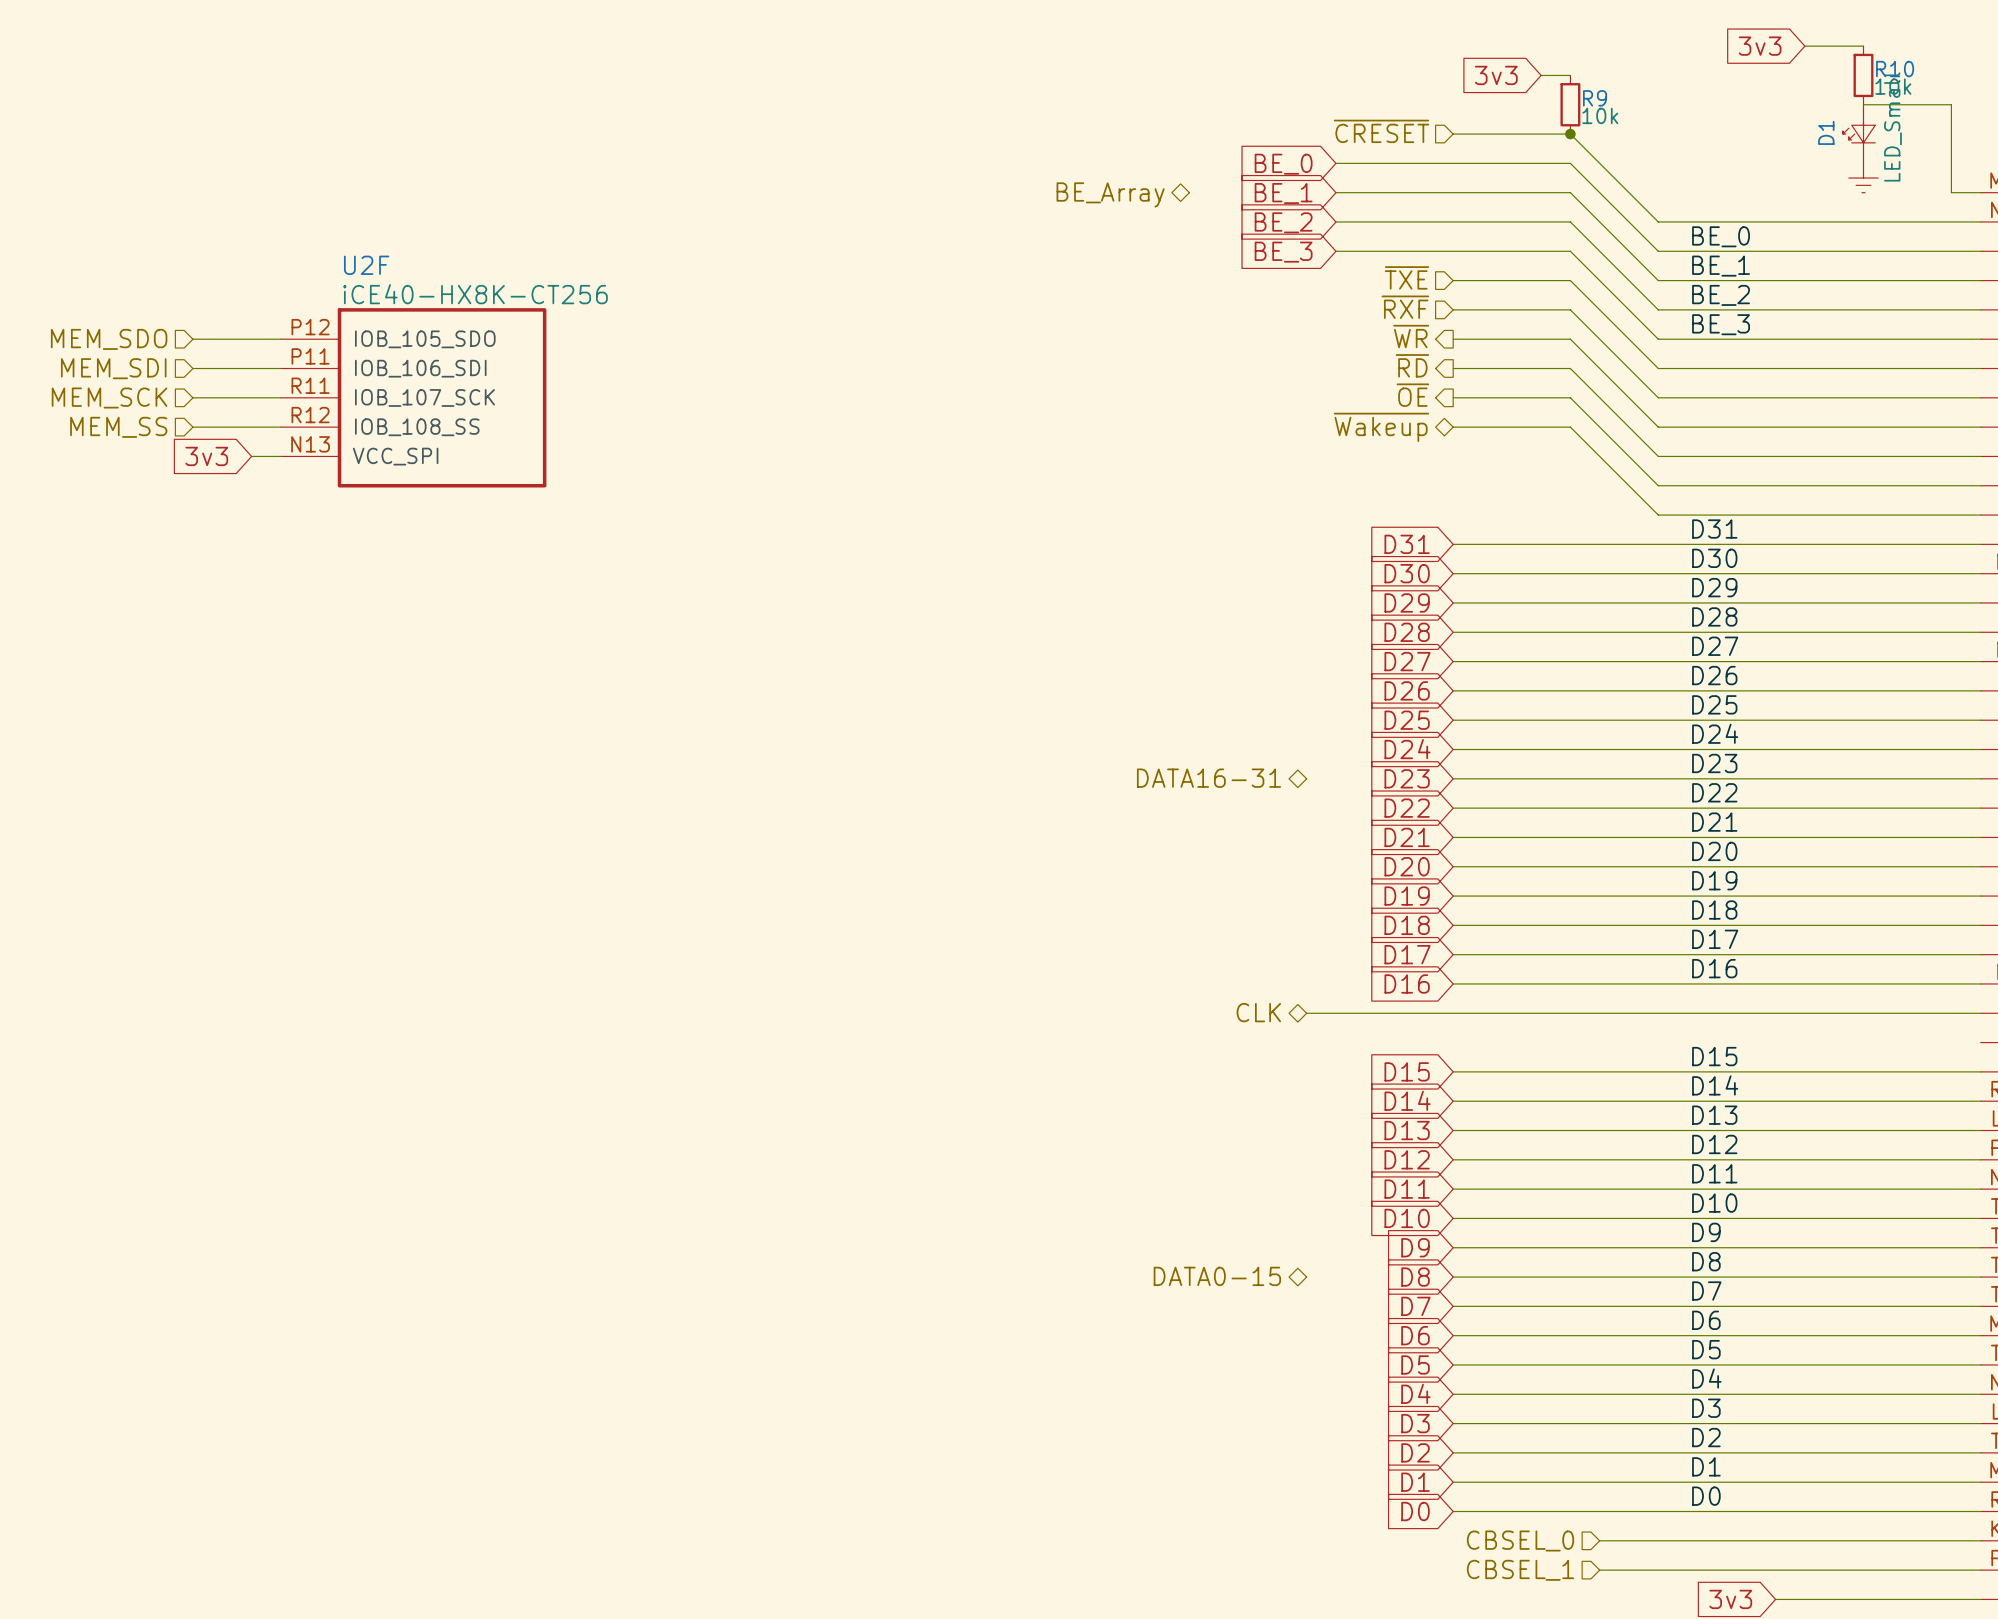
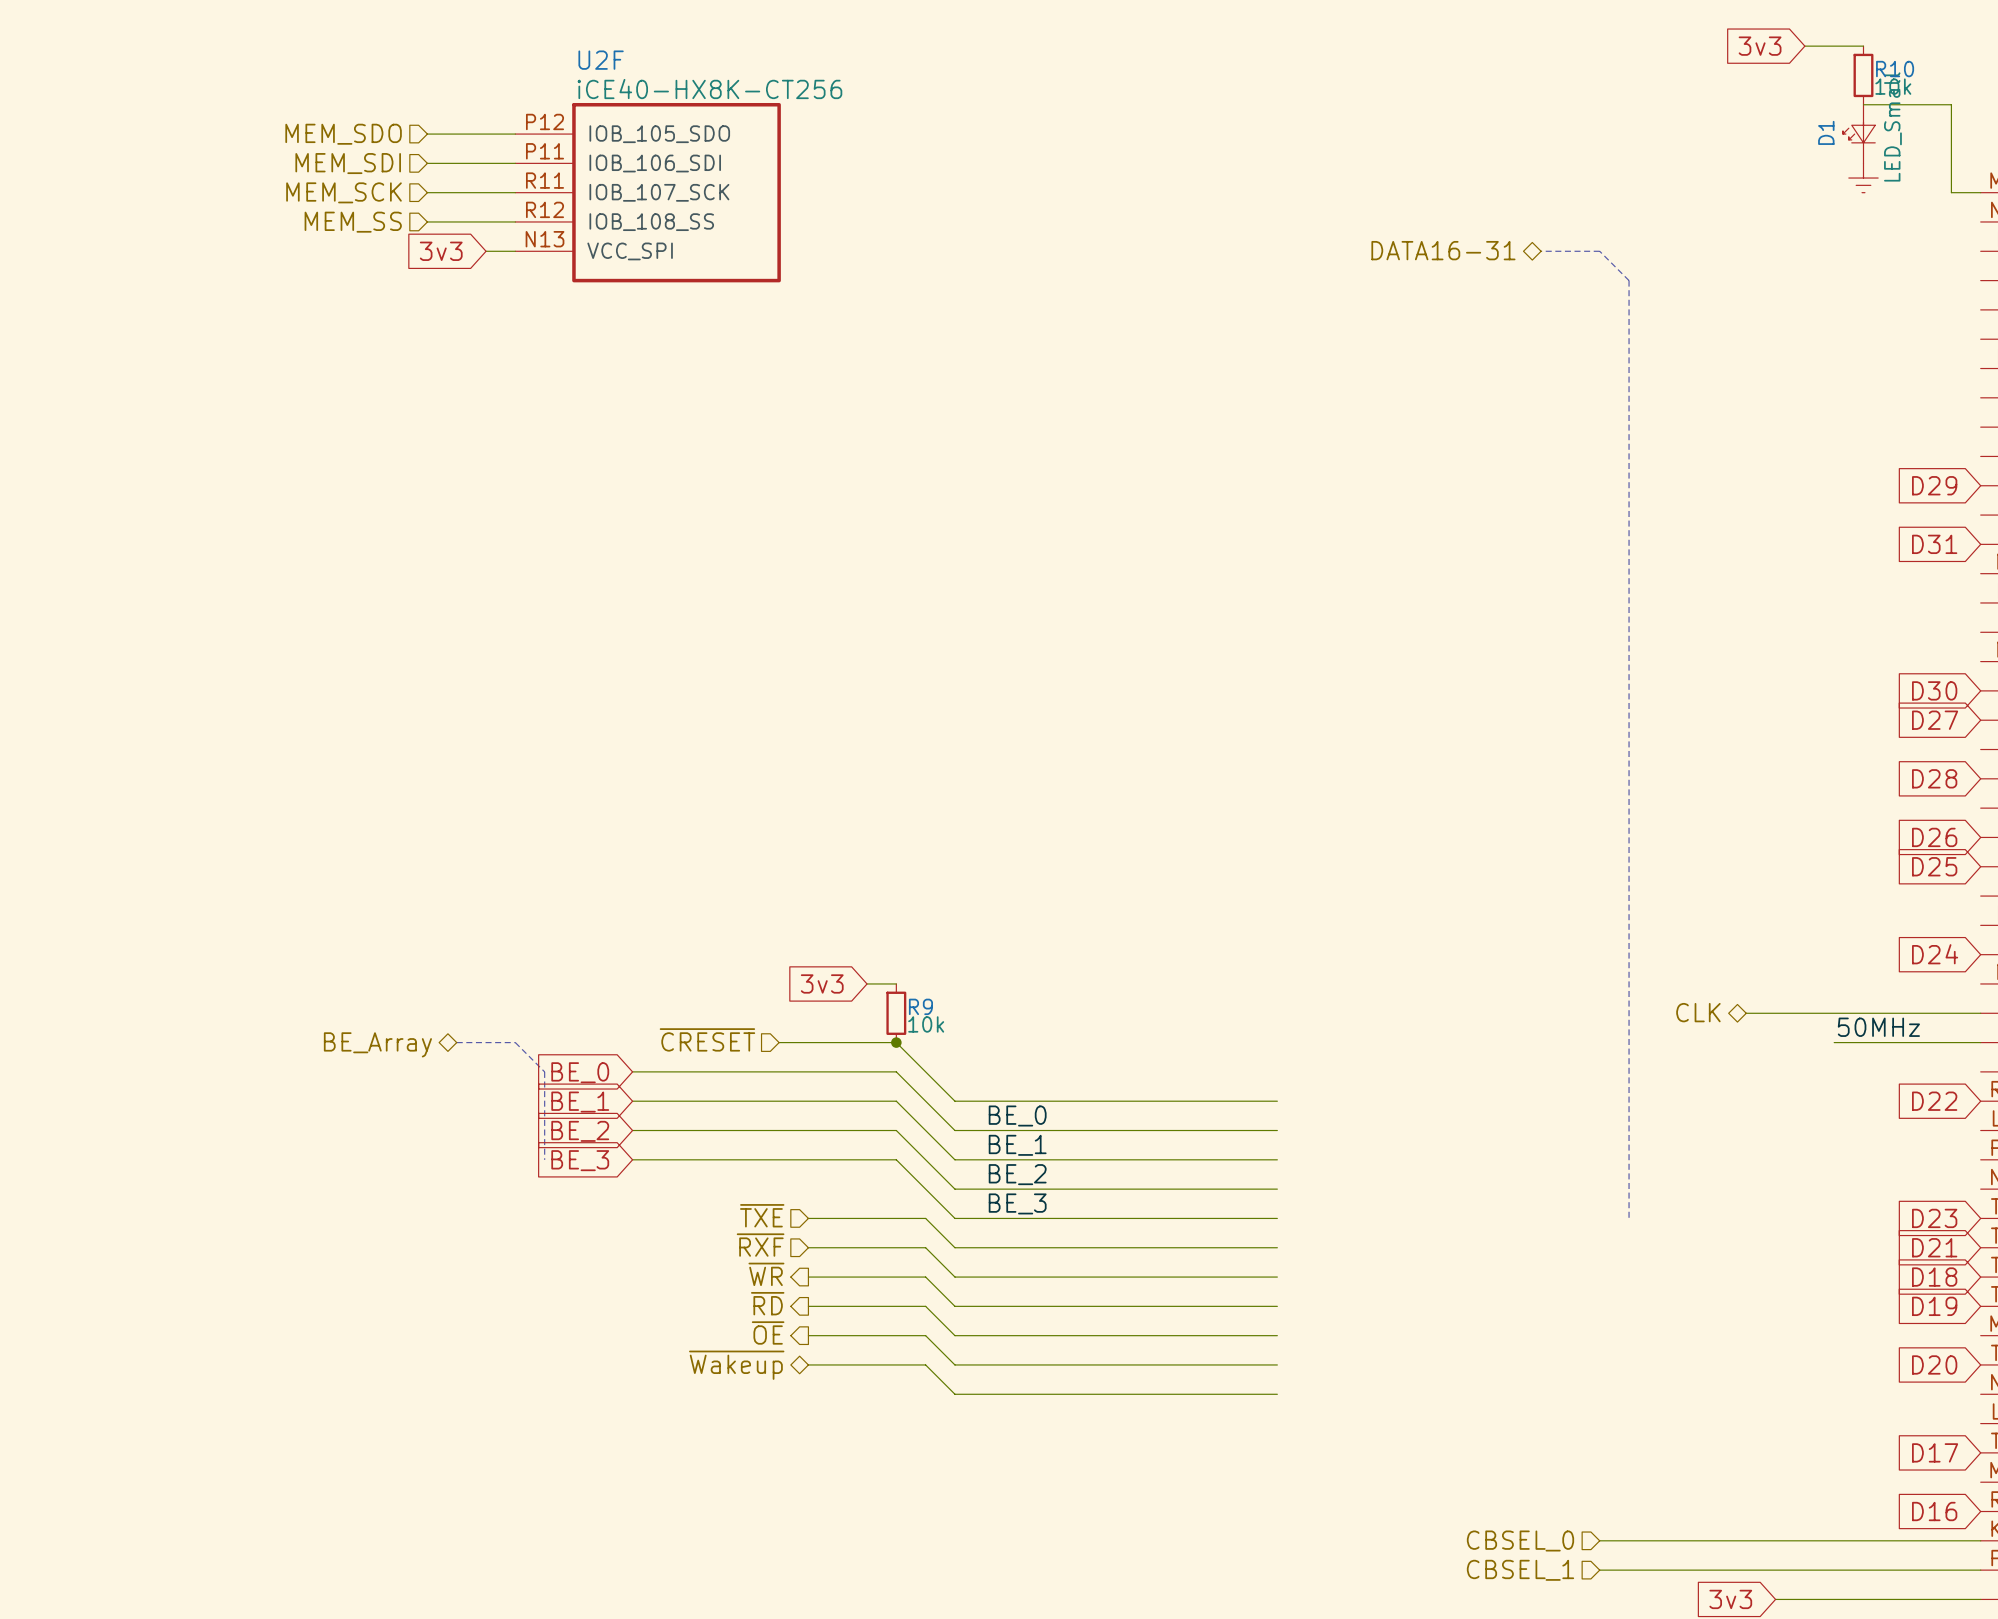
global label: 3v3 (1496, 75) -> none
wire: (1541, 75) (1570, 75) -> none
R9 position: (1570, 104) -> (896, 1013)
hierarchical label: ~{CRESET} (1381, 131) -> none
hierarchical label: none -> MEM_SDO (343, 134)
wire: none -> (427, 134) (515, 134)
wire: (1453, 134) (1570, 134) (1658, 221) (1980, 221) -> none
junction: (1570, 134) -> none
hierarchical label: none -> MEM_SDI (348, 163)
wire: none -> (427, 163) (515, 163)
wire: (1335, 163) (1570, 163) (1658, 251) (1980, 251) -> none
global label: BE_0 (1283, 164) -> none
hierarchical label: none -> MEM_SCK (344, 192)
wire: (1335, 192) (1570, 192) (1658, 280) (1980, 280) -> none
global label: BE_1 (1283, 193) -> none
hierarchical label: BE_Array (1110, 194) -> none
wire: (1335, 221) (1570, 221) (1658, 309) (1980, 309) -> none
hierarchical label: none -> MEM_SS (353, 222)
global label: BE_2 (1283, 222) -> none
label: BE_0 (1721, 236) -> none
hierarchical label: none -> DATA16-31 (1443, 250)
global label: none -> 3v3 (441, 251)
wire: none -> (486, 251) (515, 251)
wire: (1335, 251) (1570, 251) (1658, 339) (1980, 339) -> none
line: none -> (1541, 251) (1599, 251) (1629, 280) (1629, 1218)
global label: BE_3 (1283, 252) -> none
label: BE_1 (1721, 266) -> none
hierarchical label: ~{TXE} (1406, 277) -> none
wire: (1453, 280) (1570, 280) (1658, 368) (1980, 368) -> none
label: BE_2 (1721, 295) -> none
hierarchical label: ~{RXF} (1405, 307) -> none
wire: (1453, 309) (1570, 309) (1658, 397) (1980, 397) -> none
label: BE_3 (1721, 324) -> none
hierarchical label: ~{WR} (1411, 336) -> none
hierarchical label: MEM_SDO (109, 339) -> none
wire: (192, 339) (280, 339) -> (427, 192) (515, 192)
wire: (1453, 339) (1570, 339) (1658, 427) (1980, 427) -> none
hierarchical label: ~{RD} (1412, 365) -> none
hierarchical label: MEM_SDI (113, 368) -> none
wire: (192, 368) (280, 368) -> (427, 221) (515, 221)
wire: (1453, 368) (1570, 368) (1658, 456) (1980, 456) -> none
hierarchical label: ~{OE} (1412, 395) -> none
wire: (192, 397) (280, 397) -> none
U2F position: (413, 397) -> (648, 192)
wire: (1453, 397) (1570, 397) (1658, 485) (1980, 485) -> none
hierarchical label: MEM_SCK (109, 398) -> none
hierarchical label: MEM_SS (118, 427) -> none
wire: (192, 427) (280, 427) -> none
hierarchical label: ~{Wakeup} (1381, 427) -> none
wire: (1453, 427) (1570, 427) (1658, 515) (1980, 515) -> none
global label: 3v3 (206, 456) -> none
wire: (251, 456) (280, 456) -> none
global label: none -> D29 (1934, 485)
label: D31 (1714, 529) -> none
global label: D31 (1407, 544) -> none
wire: (1453, 544) (1980, 544) -> none
global label: none -> D31 (1934, 544)
label: D30 (1714, 558) -> none
global label: D30 (1407, 573) -> none
wire: (1453, 573) (1980, 573) -> none
label: D29 (1714, 587) -> none
global label: D29 (1407, 602) -> none
wire: (1453, 602) (1980, 602) -> none
label: D28 (1714, 616) -> none
global label: D28 (1407, 632) -> none
wire: (1453, 632) (1980, 632) -> none
label: D27 (1715, 646) -> none
global label: D27 (1407, 661) -> none
wire: (1453, 661) (1980, 661) -> none
label: D26 (1714, 675) -> none
global label: D26 (1407, 690) -> none
wire: (1453, 690) (1980, 690) -> none
global label: none -> D30 (1934, 690)
label: D25 (1714, 704) -> none
global label: D25 (1407, 720) -> none
wire: (1453, 720) (1980, 720) -> none
global label: none -> D27 (1935, 720)
label: D24 (1715, 733) -> none
global label: D24 (1407, 749) -> none
wire: (1453, 749) (1980, 749) -> none
label: D23 (1714, 763) -> none
hierarchical label: DATA16-31 (1208, 778) -> none
global label: D23 (1407, 778) -> none
wire: (1453, 778) (1980, 778) -> none
global label: none -> D28 (1934, 778)
label: D22 (1714, 792) -> none
global label: D22 (1407, 808) -> none
wire: (1453, 808) (1980, 808) -> none
label: D21 (1714, 822) -> none
global label: D21 (1407, 837) -> none
wire: (1453, 837) (1980, 837) -> none
global label: none -> D26 (1934, 837)
label: D20 (1714, 851) -> none
global label: D20 (1407, 866) -> none
wire: (1453, 866) (1980, 866) -> none
global label: none -> D25 (1934, 866)
label: D19 (1714, 880) -> none
global label: D19 (1407, 896) -> none
wire: (1453, 896) (1980, 896) -> none
label: D18 (1714, 910) -> none
global label: D18 (1407, 925) -> none
wire: (1453, 925) (1980, 925) -> none
label: D17 (1715, 939) -> none
global label: D17 (1407, 954) -> none
wire: (1453, 954) (1980, 954) -> none
global label: none -> D24 (1935, 954)
label: D16 (1714, 968) -> none
global label: none -> 3v3 (822, 983)
wire: none -> (867, 983) (896, 983)
global label: D16 (1407, 983) -> none
wire: (1453, 983) (1980, 983) -> none
hierarchical label: CLK (1258, 1012) -> none
hierarchical label: none -> CLK (1698, 1012)
wire: (1306, 1013) (1746, 1013) -> none
label: none -> 50MHz (1878, 1027)
hierarchical label: none -> ~{CRESET} (707, 1039)
line: none -> (456, 1042) (515, 1042) (544, 1071) (544, 1159)
wire: none -> (779, 1042) (896, 1042) (954, 1101) (1277, 1101)
junction: none -> (896, 1042)
wire: none -> (1834, 1042) (1980, 1042)
hierarchical label: none -> BE_Array (377, 1044)
label: D15 (1714, 1056) -> none
wire: none -> (632, 1071) (896, 1071) (954, 1130) (1277, 1130)
global label: D15 (1407, 1071) -> none
wire: (1453, 1071) (1980, 1071) -> none
global label: none -> BE_0 (580, 1072)
label: D14 (1715, 1085) -> none
global label: D14 (1407, 1100) -> none
wire: none -> (632, 1101) (896, 1101) (954, 1159) (1277, 1159)
wire: (1453, 1101) (1980, 1101) -> none
global label: none -> D22 (1934, 1101)
global label: none -> BE_1 (580, 1102)
label: D13 (1714, 1115) -> none
label: none -> BE_0 (1017, 1116)
wire: none -> (632, 1130) (896, 1130) (954, 1189) (1277, 1189)
global label: D13 (1407, 1130) -> none
wire: (1453, 1130) (1980, 1130) -> none
global label: none -> BE_2 (580, 1131)
label: D12 (1714, 1144) -> none
label: none -> BE_1 (1017, 1145)
wire: none -> (632, 1159) (896, 1159) (954, 1218) (1277, 1218)
global label: D12 (1407, 1159) -> none
wire: (1453, 1159) (1980, 1159) -> none
global label: none -> BE_3 (580, 1160)
label: D11 (1714, 1173) -> none
label: none -> BE_2 (1017, 1174)
global label: D11 (1407, 1189) -> none
wire: (1453, 1189) (1980, 1189) -> none
label: none -> BE_3 (1017, 1203)
label: D10 (1714, 1203) -> none
hierarchical label: none -> ~{TXE} (762, 1215)
wire: none -> (808, 1218) (925, 1218) (954, 1247) (1277, 1247)
global label: D10 (1407, 1218) -> none
wire: (1453, 1218) (1980, 1218) -> none
global label: none -> D23 (1934, 1218)
label: D9 (1706, 1232) -> none
hierarchical label: none -> ~{RXF} (760, 1245)
wire: none -> (808, 1247) (925, 1247) (954, 1277) (1277, 1277)
global label: D9 (1415, 1247) -> none
wire: (1453, 1247) (1980, 1247) -> none
global label: none -> D21 (1934, 1247)
label: D8 (1706, 1261) -> none
hierarchical label: none -> ~{WR} (766, 1274)
hierarchical label: DATA0-15 (1217, 1276) -> none
wire: none -> (808, 1277) (925, 1277) (954, 1306) (1277, 1306)
global label: D8 (1415, 1277) -> none
wire: (1453, 1277) (1980, 1277) -> none
global label: none -> D18 (1934, 1277)
label: D7 (1706, 1291) -> none
hierarchical label: none -> ~{RD} (767, 1303)
wire: none -> (808, 1306) (925, 1306) (954, 1335) (1277, 1335)
global label: D7 (1415, 1306) -> none
wire: (1453, 1306) (1980, 1306) -> none
global label: none -> D19 (1934, 1306)
label: D6 (1706, 1320) -> none
hierarchical label: none -> ~{OE} (768, 1332)
wire: none -> (808, 1335) (925, 1335) (954, 1364) (1277, 1364)
global label: D6 (1415, 1335) -> none
wire: (1453, 1335) (1980, 1335) -> none
label: D5 (1706, 1349) -> none
wire: none -> (808, 1364) (925, 1364) (954, 1394) (1277, 1394)
global label: D5 (1415, 1364) -> none
wire: (1453, 1364) (1980, 1364) -> none
global label: none -> D20 (1934, 1364)
hierarchical label: none -> ~{Wakeup} (736, 1365)
label: D4 (1706, 1378) -> none
global label: D4 (1415, 1393) -> none
wire: (1453, 1394) (1980, 1394) -> none
label: D3 (1706, 1408) -> none
global label: D3 (1415, 1423) -> none
wire: (1453, 1423) (1980, 1423) -> none
label: D2 (1706, 1437) -> none
global label: D2 (1415, 1452) -> none
wire: (1453, 1452) (1980, 1452) -> none
global label: none -> D17 (1935, 1452)
label: D1 (1706, 1466) -> none
global label: D1 (1415, 1482) -> none
wire: (1453, 1482) (1980, 1482) -> none
label: D0 (1706, 1496) -> none
global label: D0 (1415, 1511) -> none
wire: (1453, 1511) (1980, 1511) -> none
global label: none -> D16 (1934, 1511)

